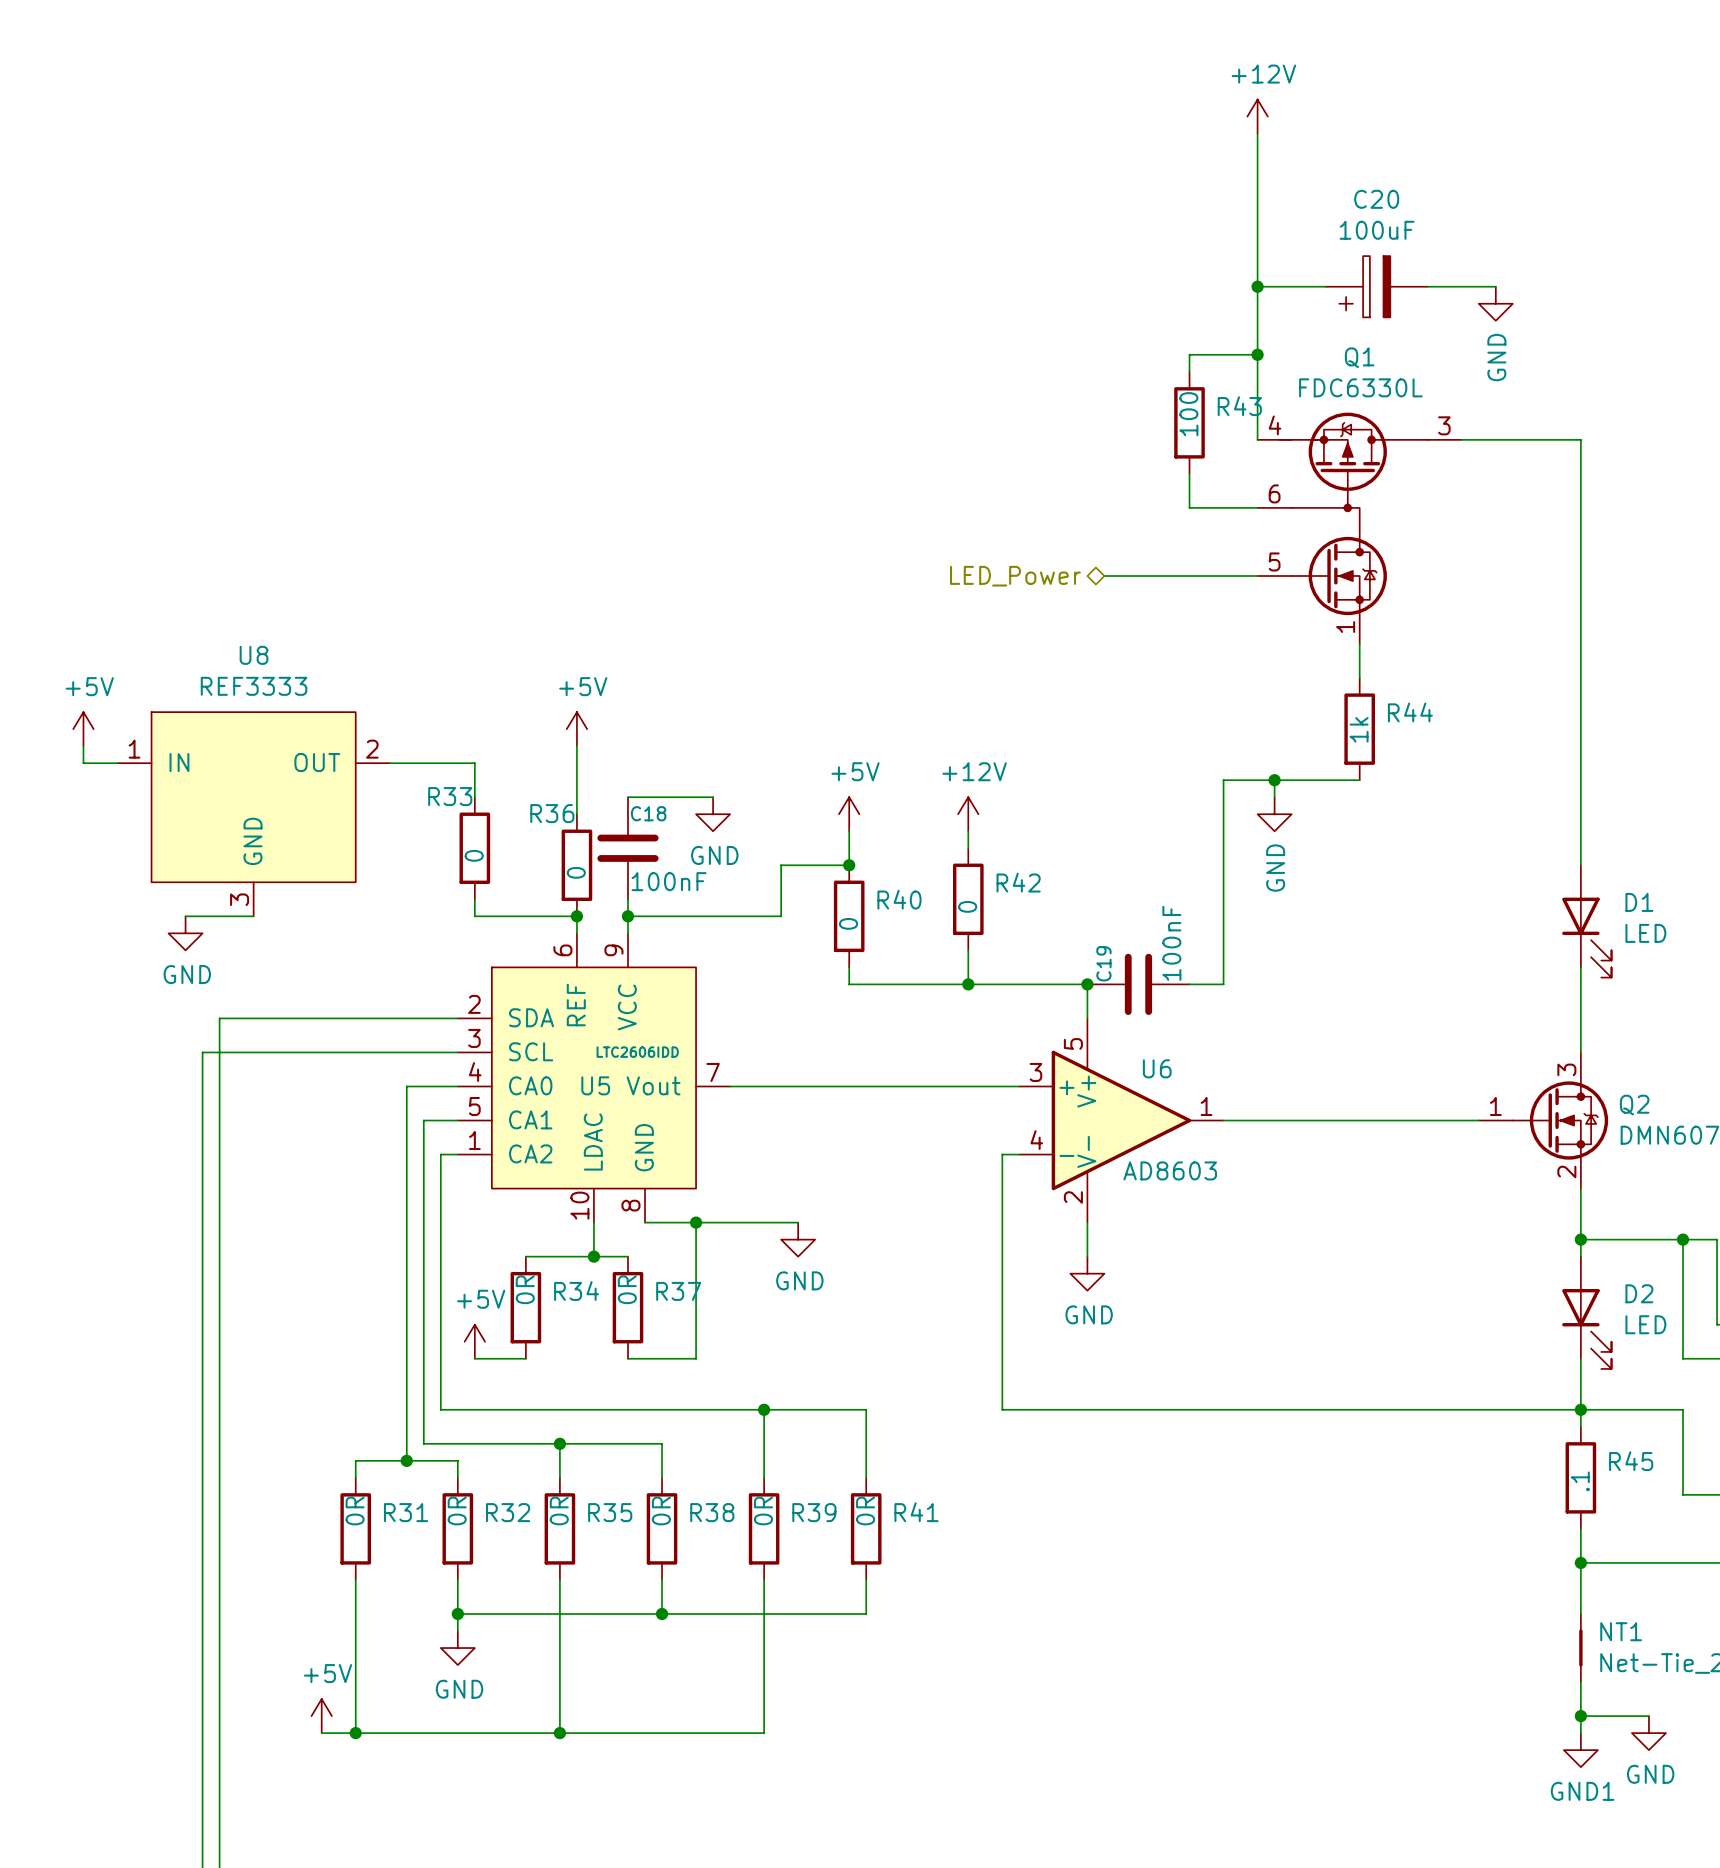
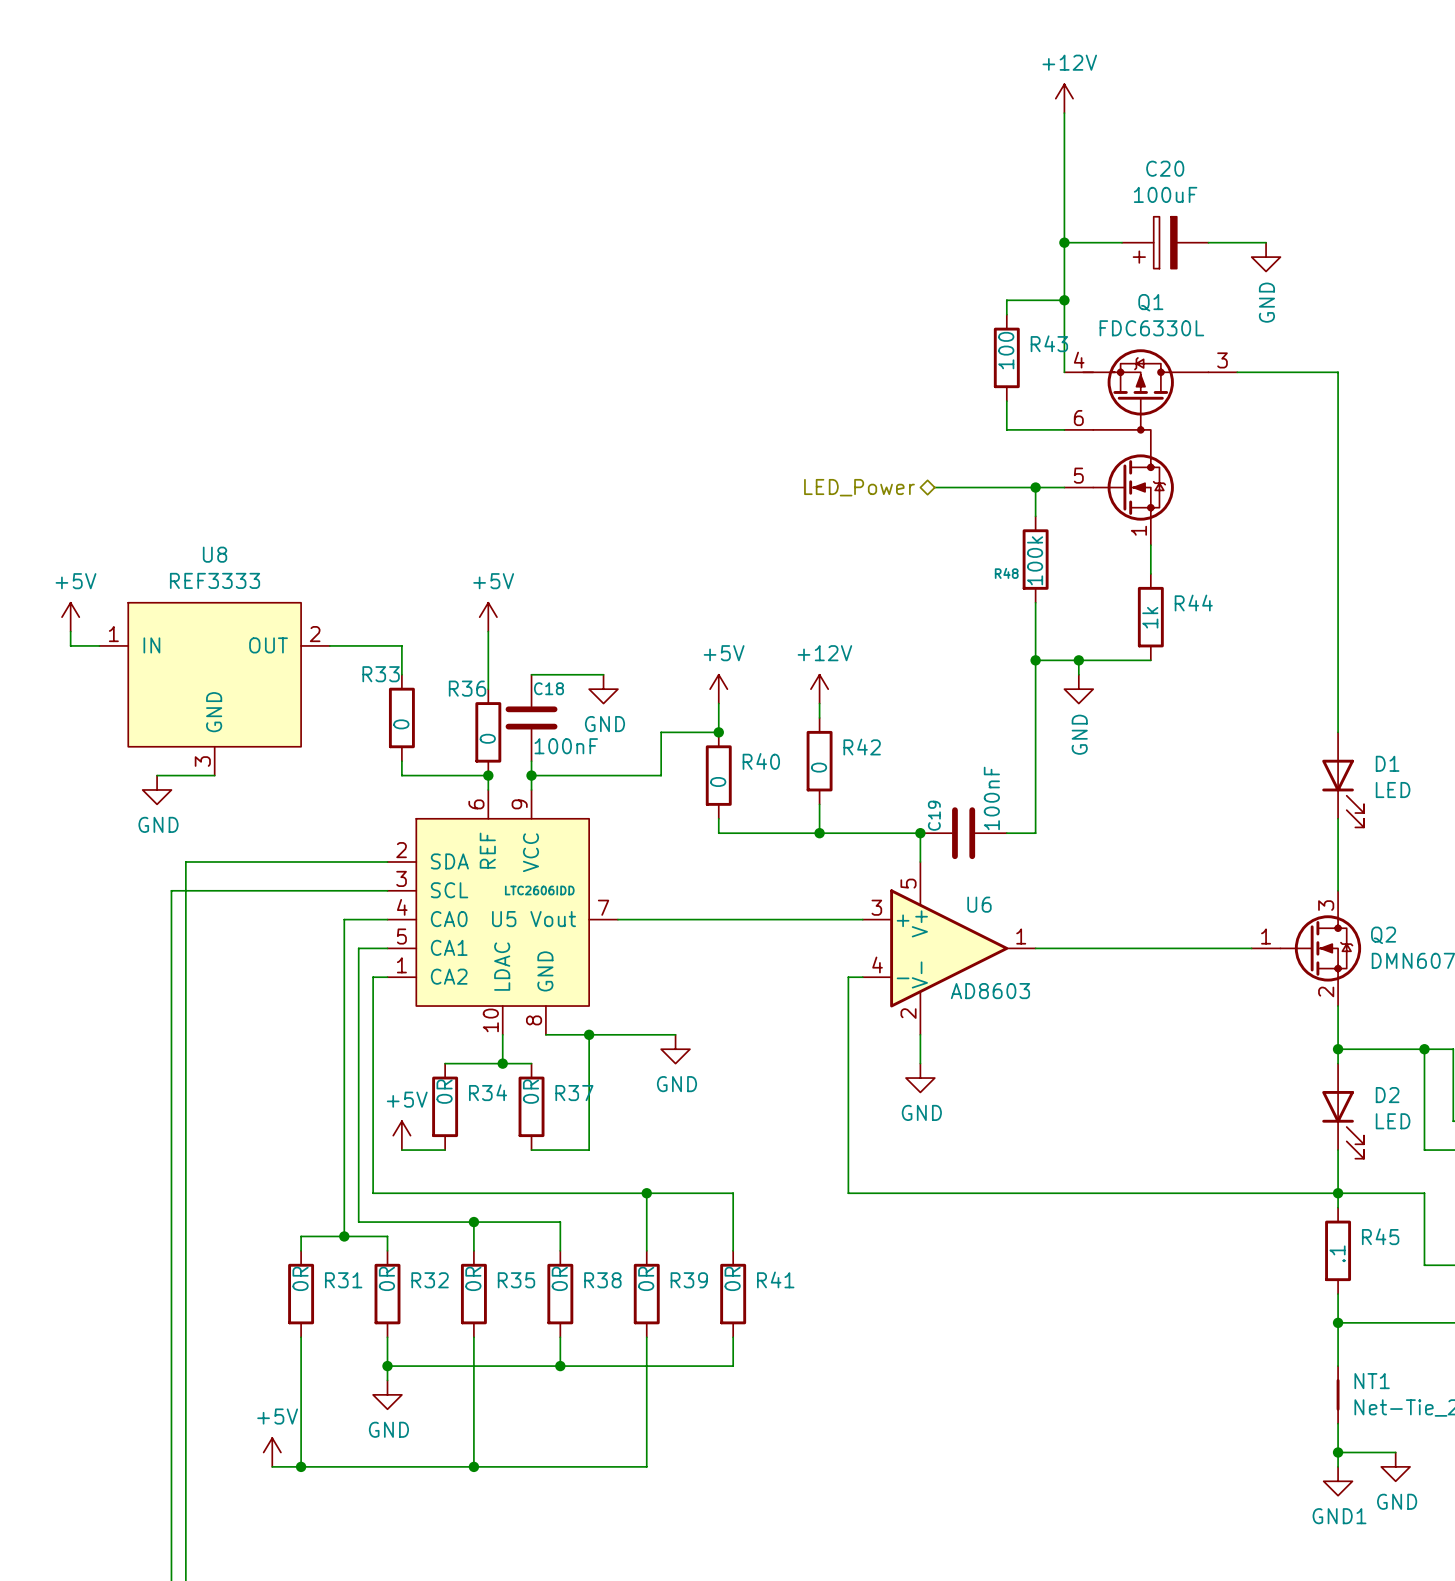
wire: none -> (1035, 487) (1035, 516)
junction: none -> (1035, 487)
R48: none -> 100k (1035, 559)
wire: none -> (1035, 602) (1035, 660)
junction: none -> (1035, 660)

